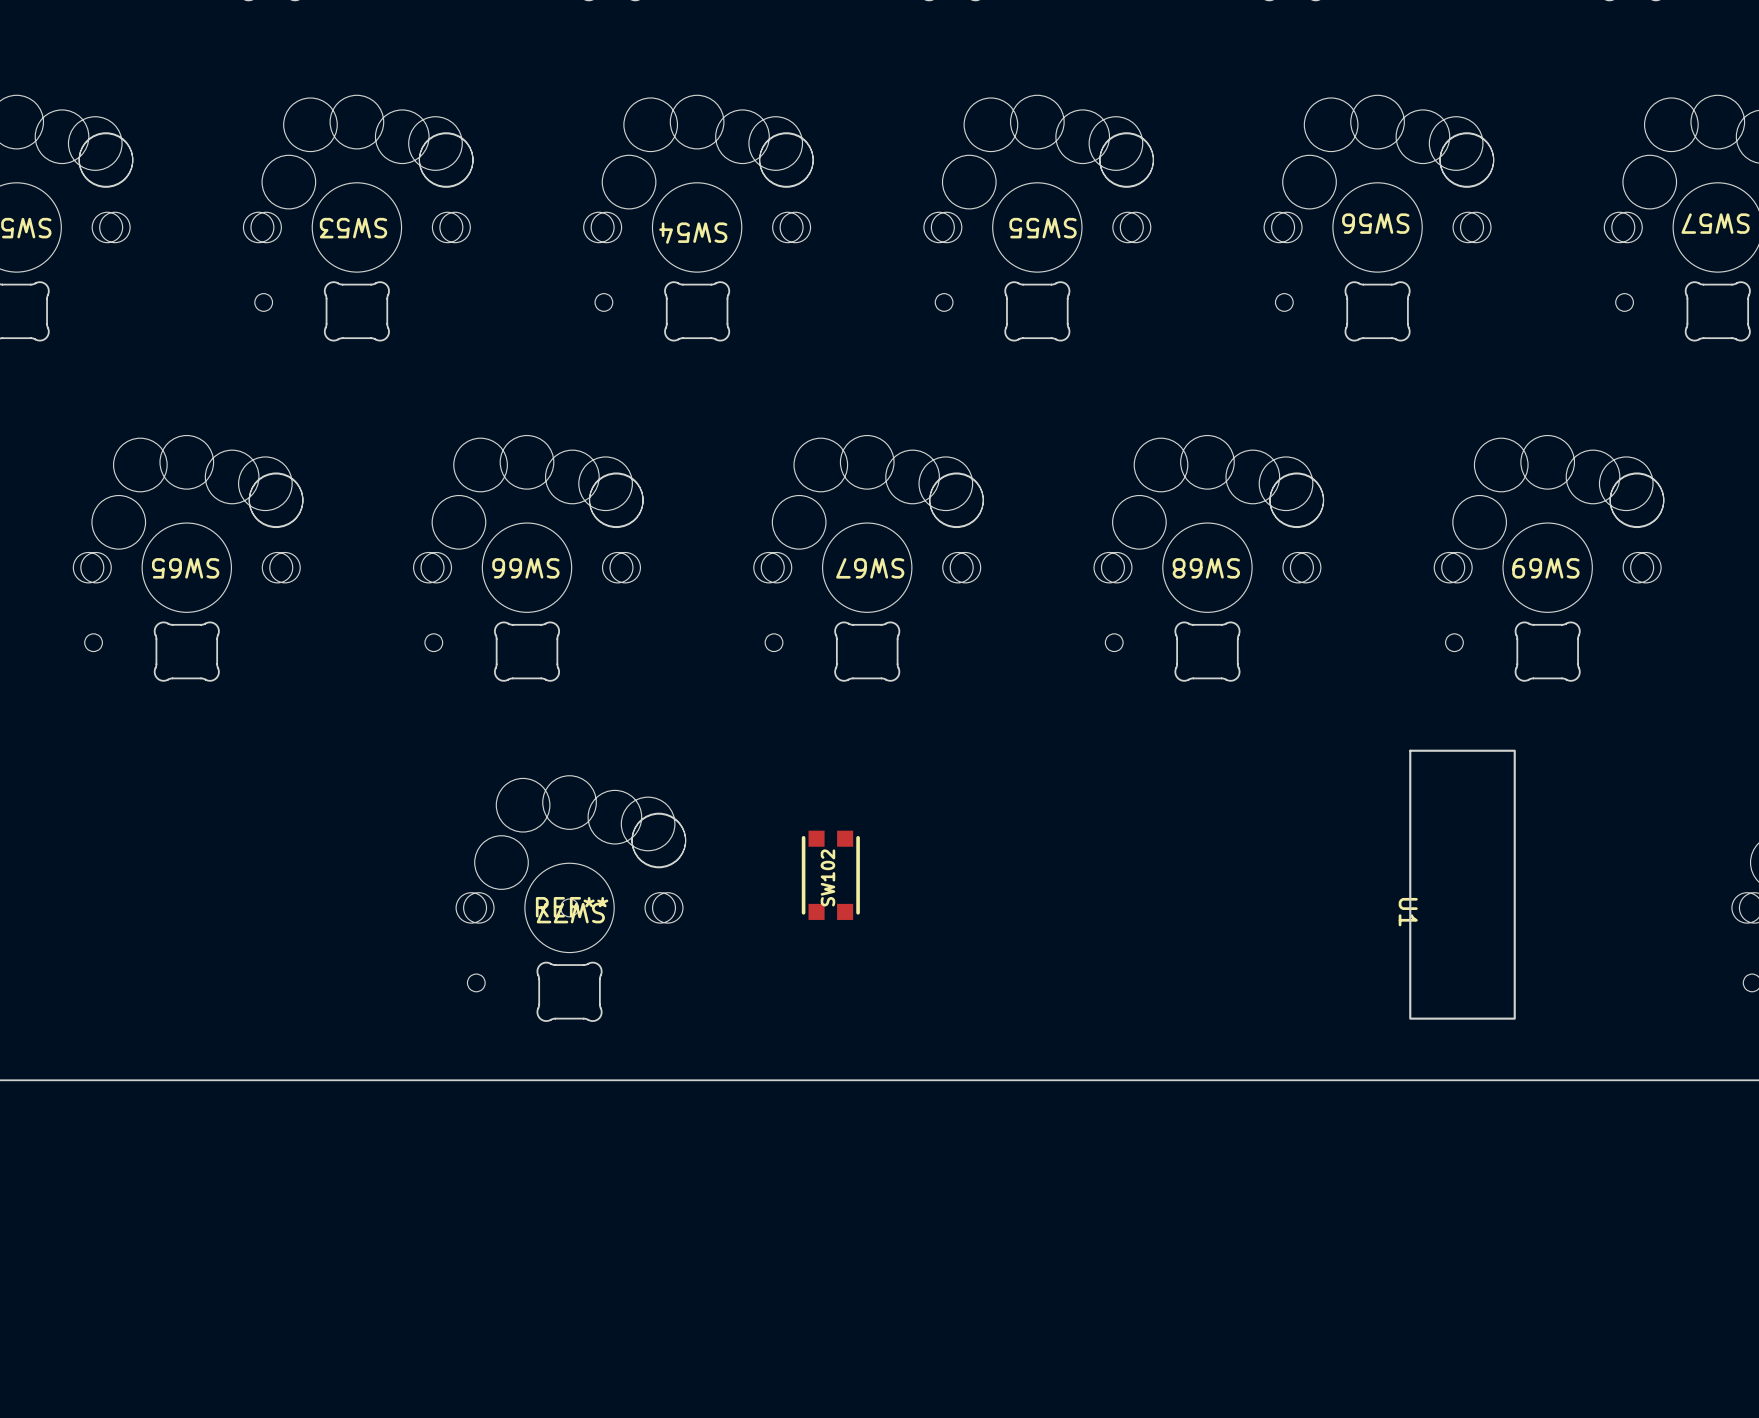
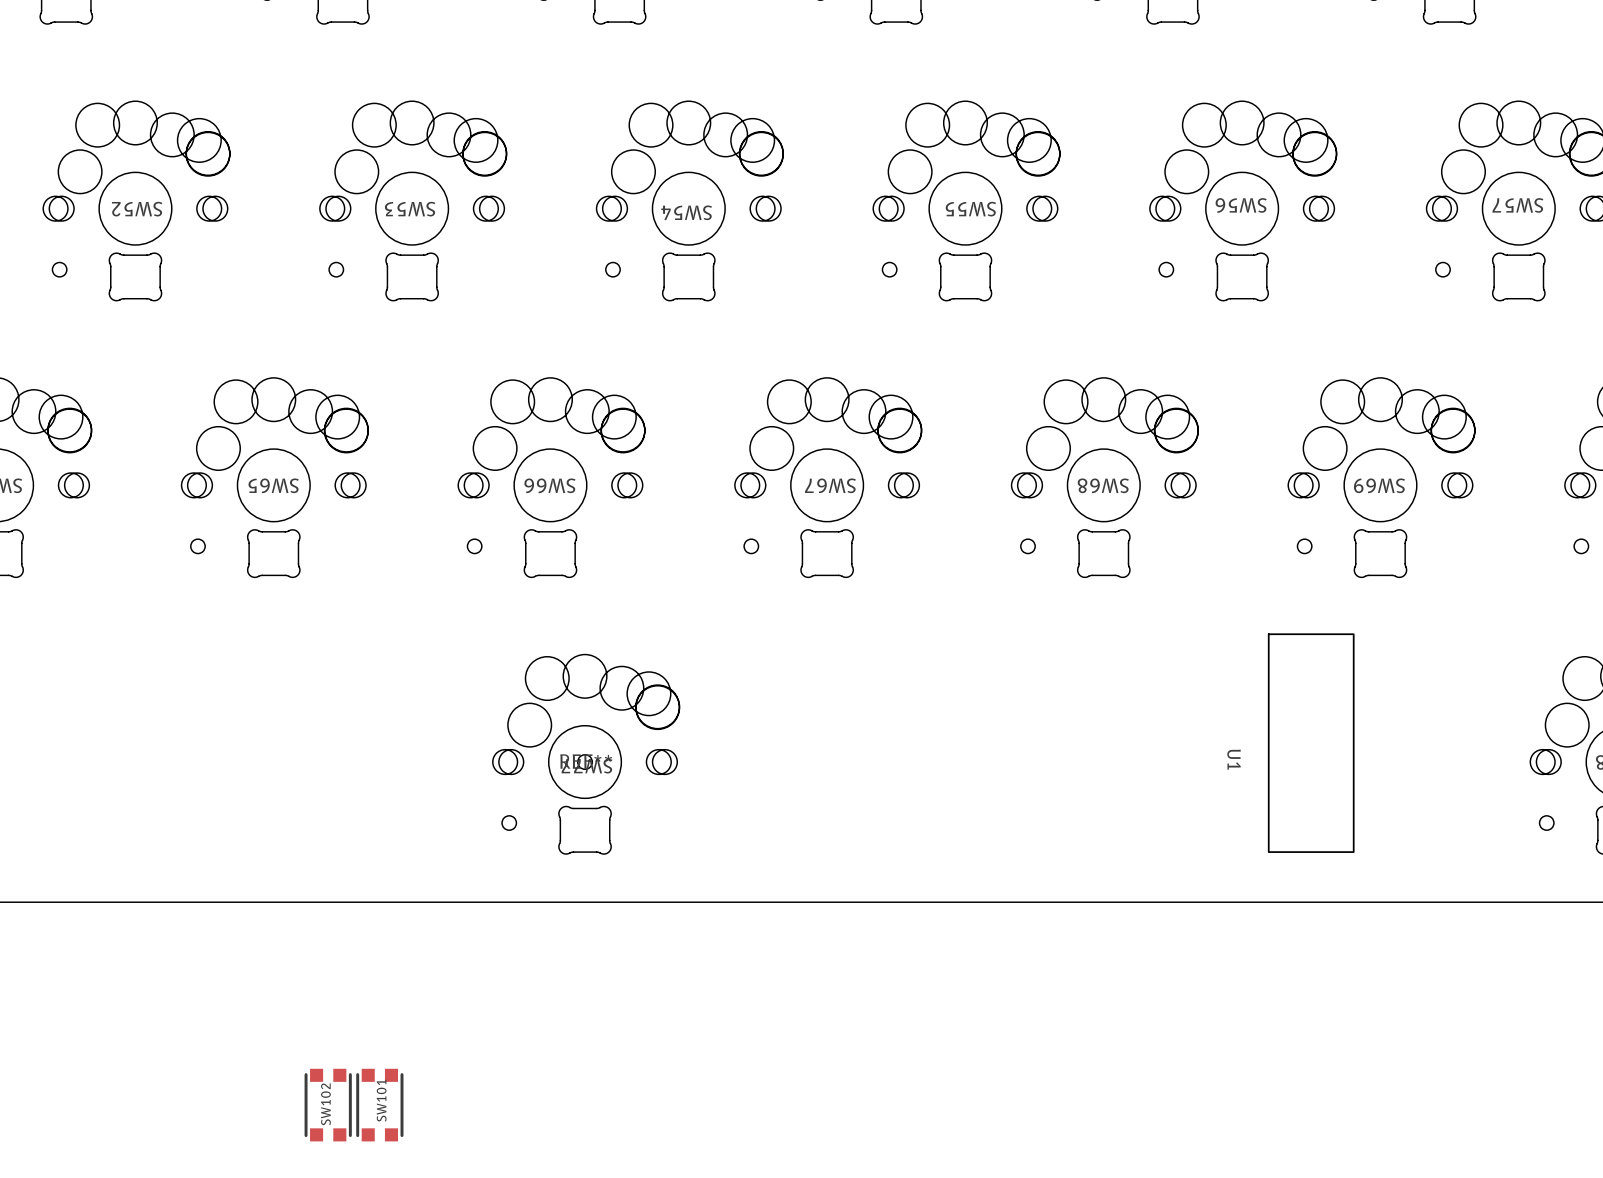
SW102 position: (830, 875) -> (328, 1105)
U1 position: (1408, 912) -> (1234, 759)
SW101: none -> (379, 1105)

